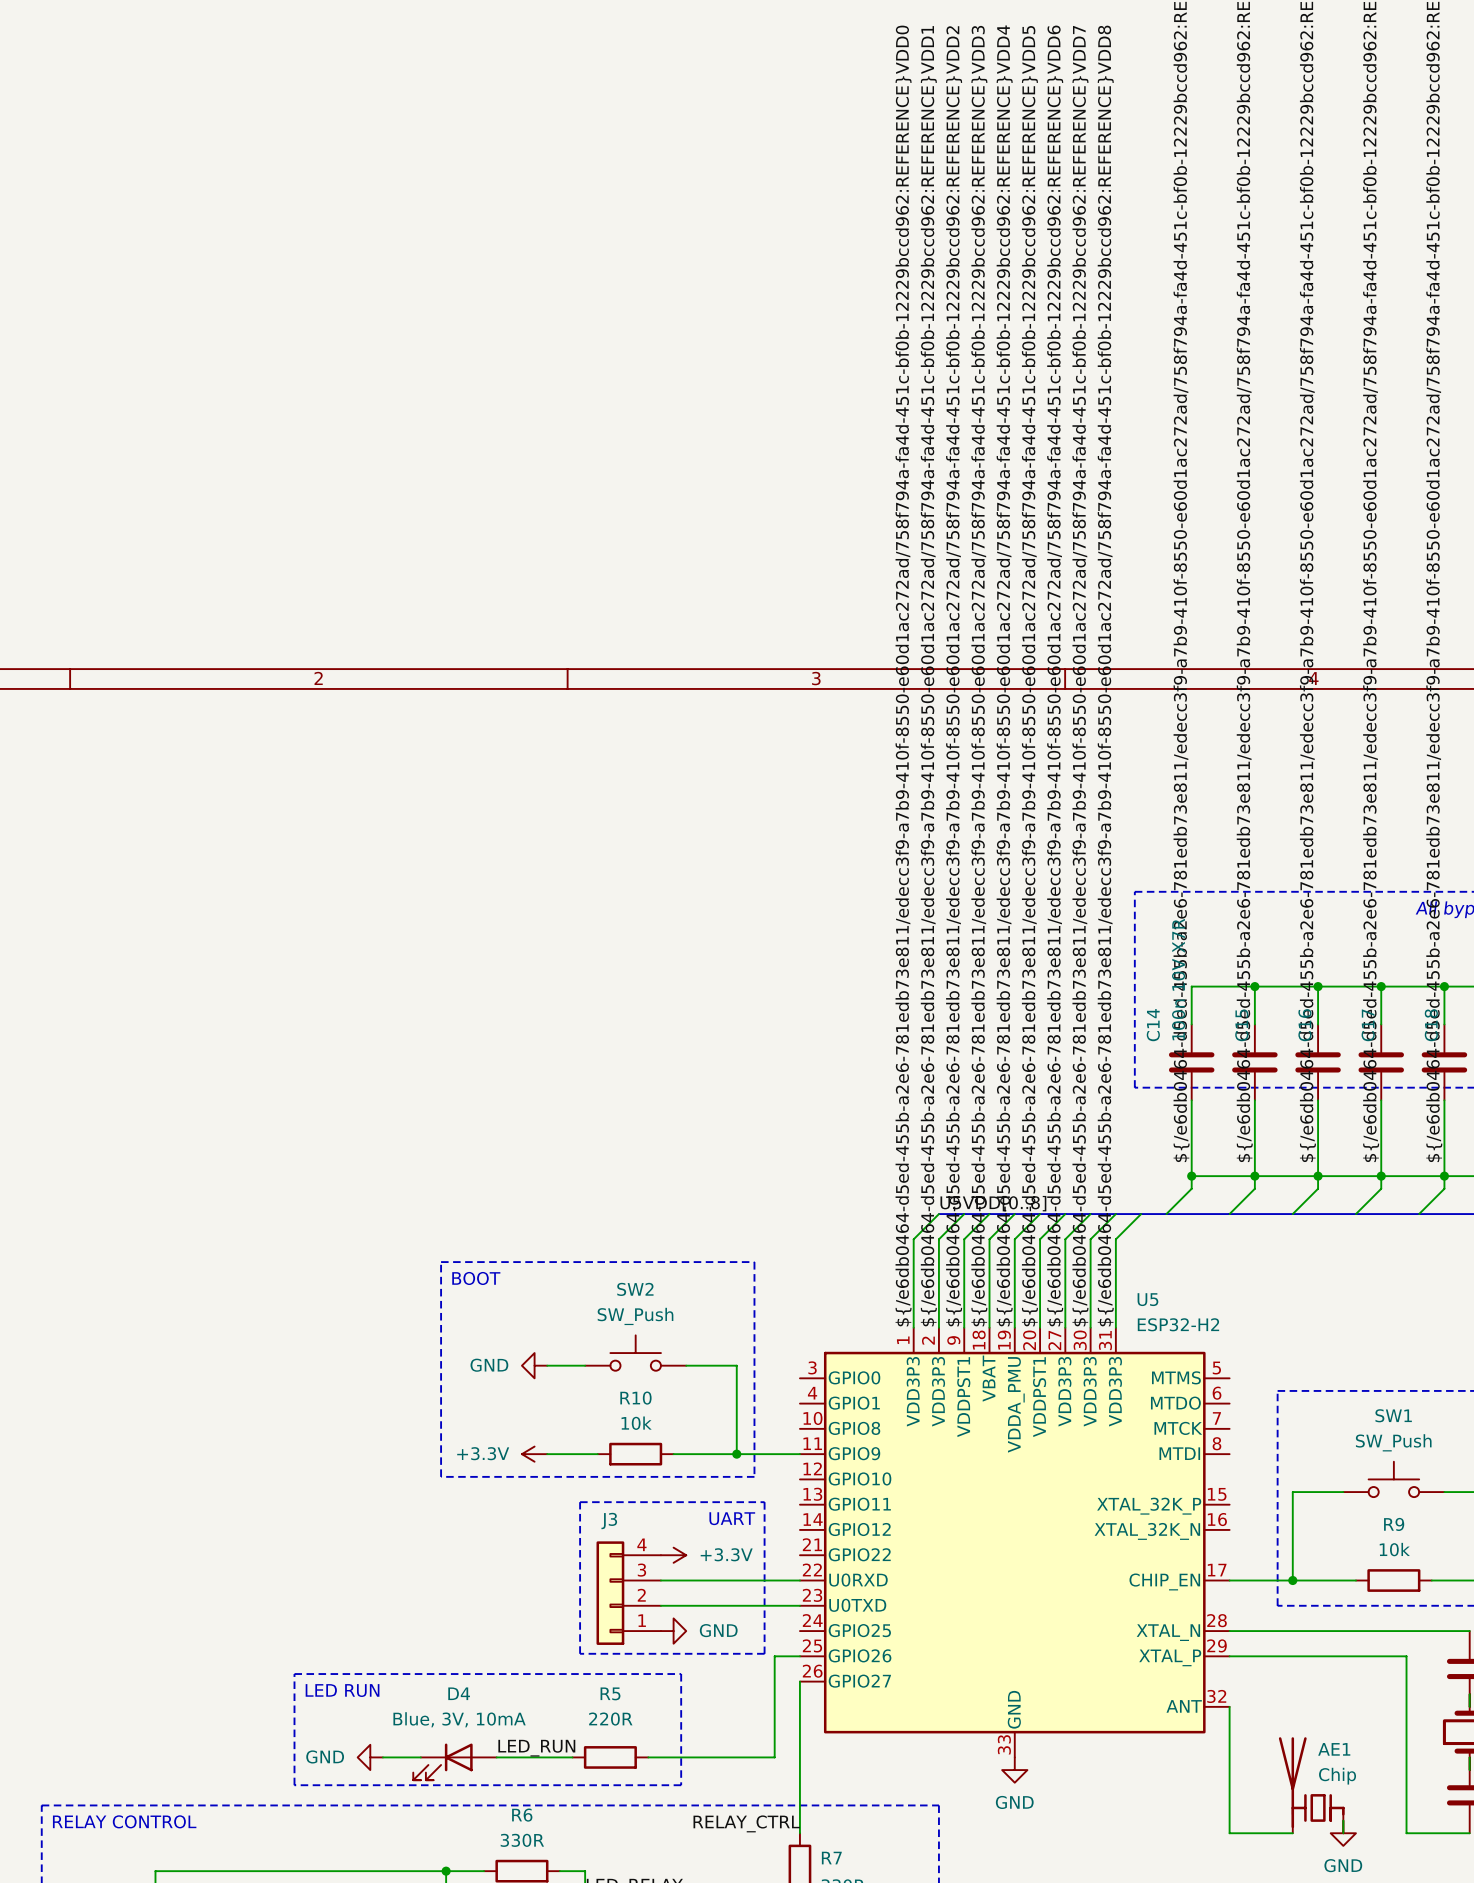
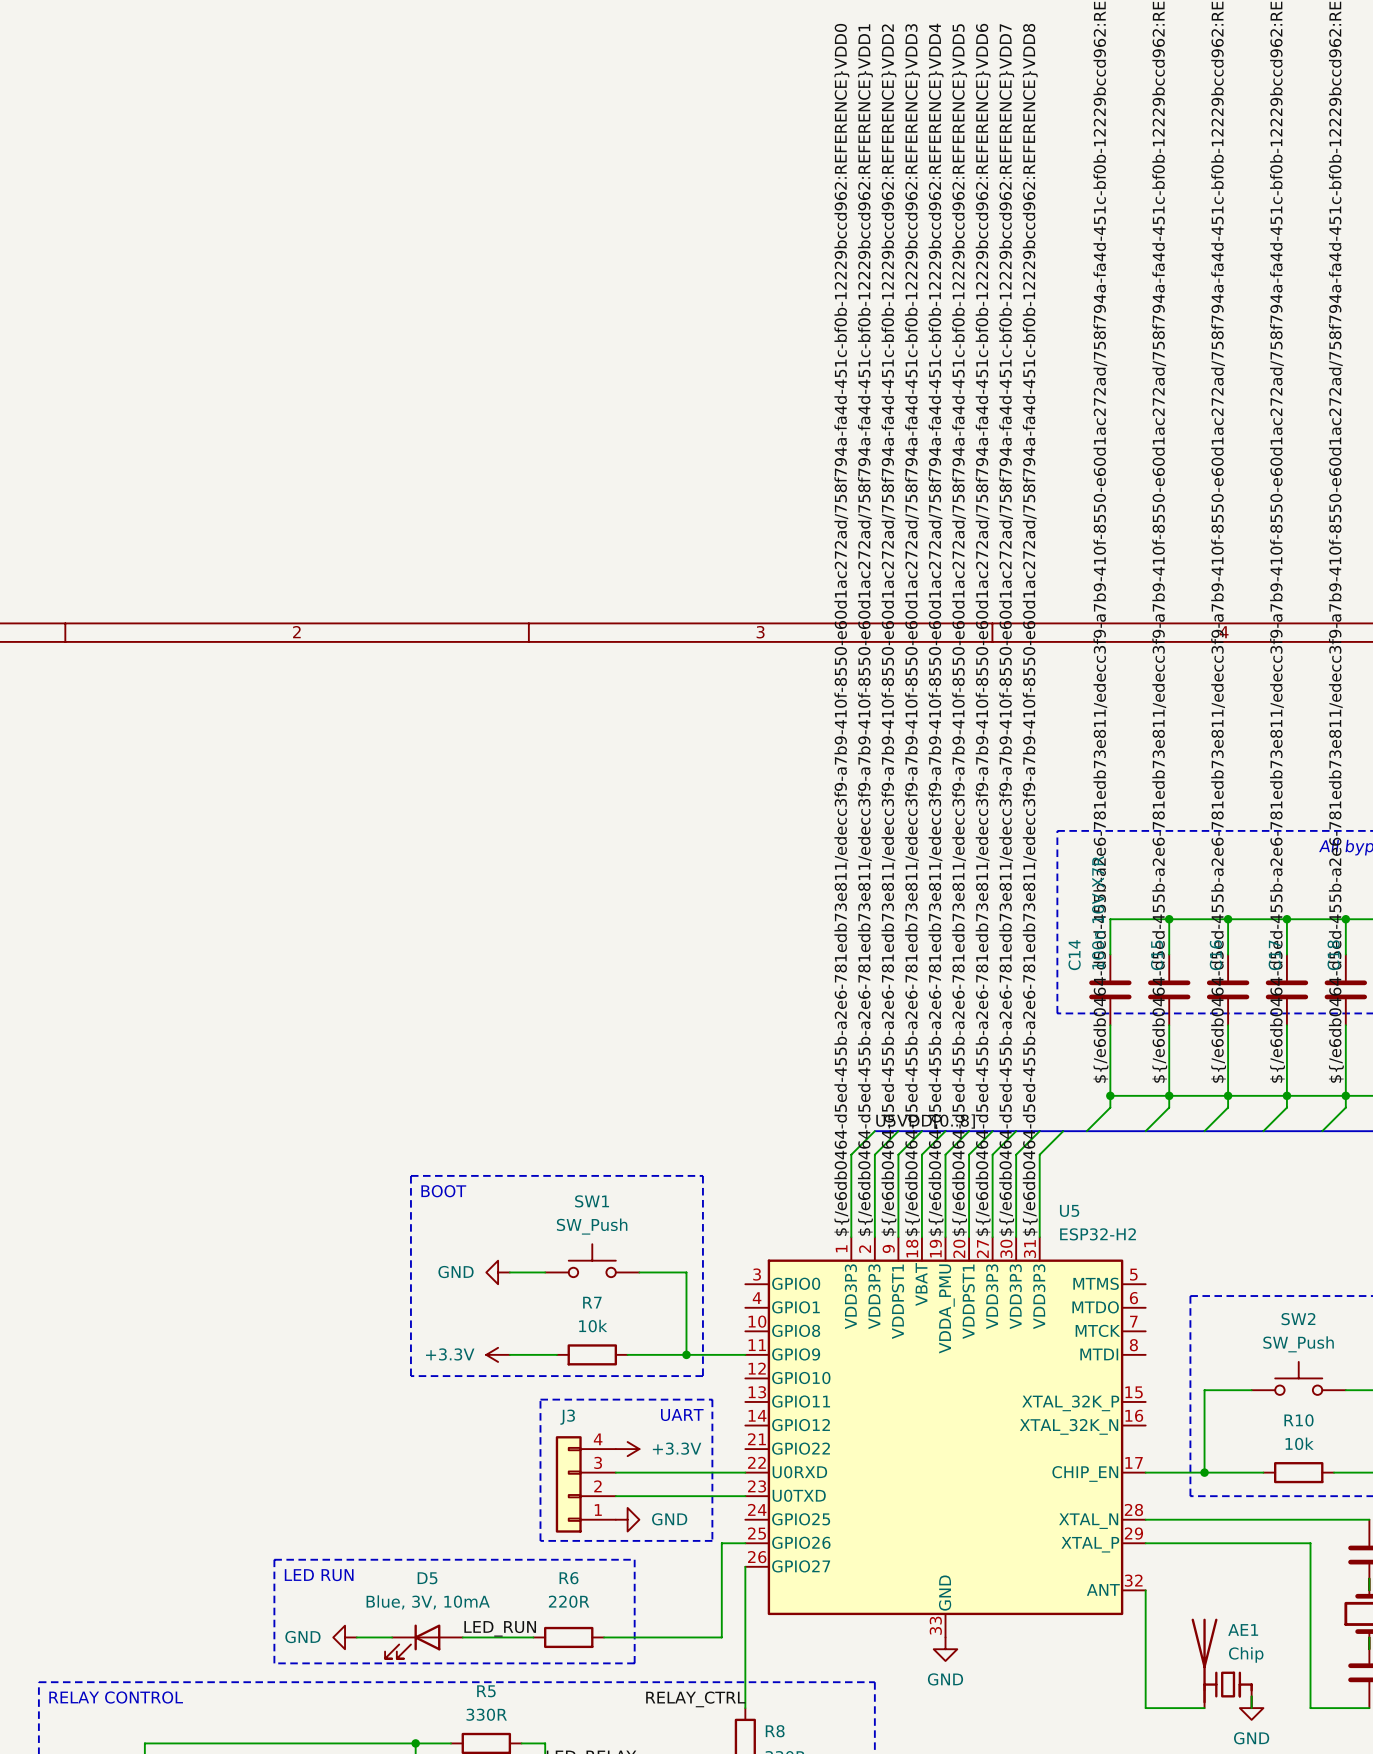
SW2 name: SW2 (635, 1289) -> SW1 (592, 1201)
R10 name: R10 (635, 1398) -> R7 (592, 1302)
SW1 name: SW1 (1393, 1415) -> SW2 (1298, 1319)
R9 name: R9 (1394, 1524) -> R10 (1298, 1420)
D4 name: D4 (459, 1693) -> D5 (427, 1578)
R5 name: R5 (610, 1693) -> R6 (569, 1578)
R6 name: R6 (522, 1815) -> R5 (486, 1691)
R7 name: R7 (831, 1858) -> R8 (775, 1731)

